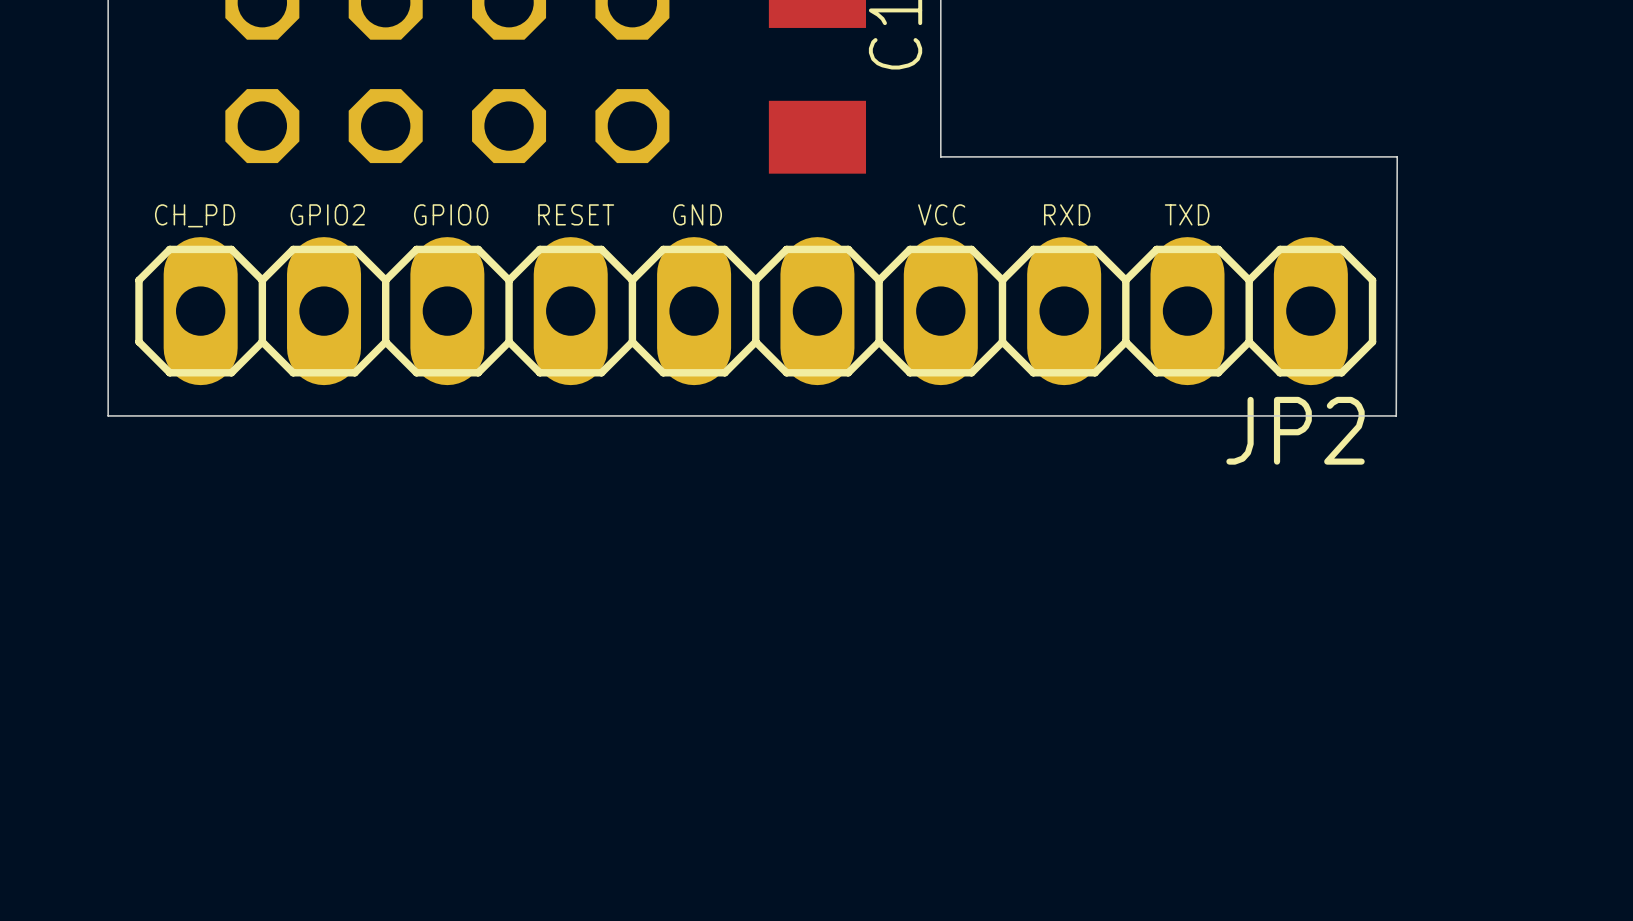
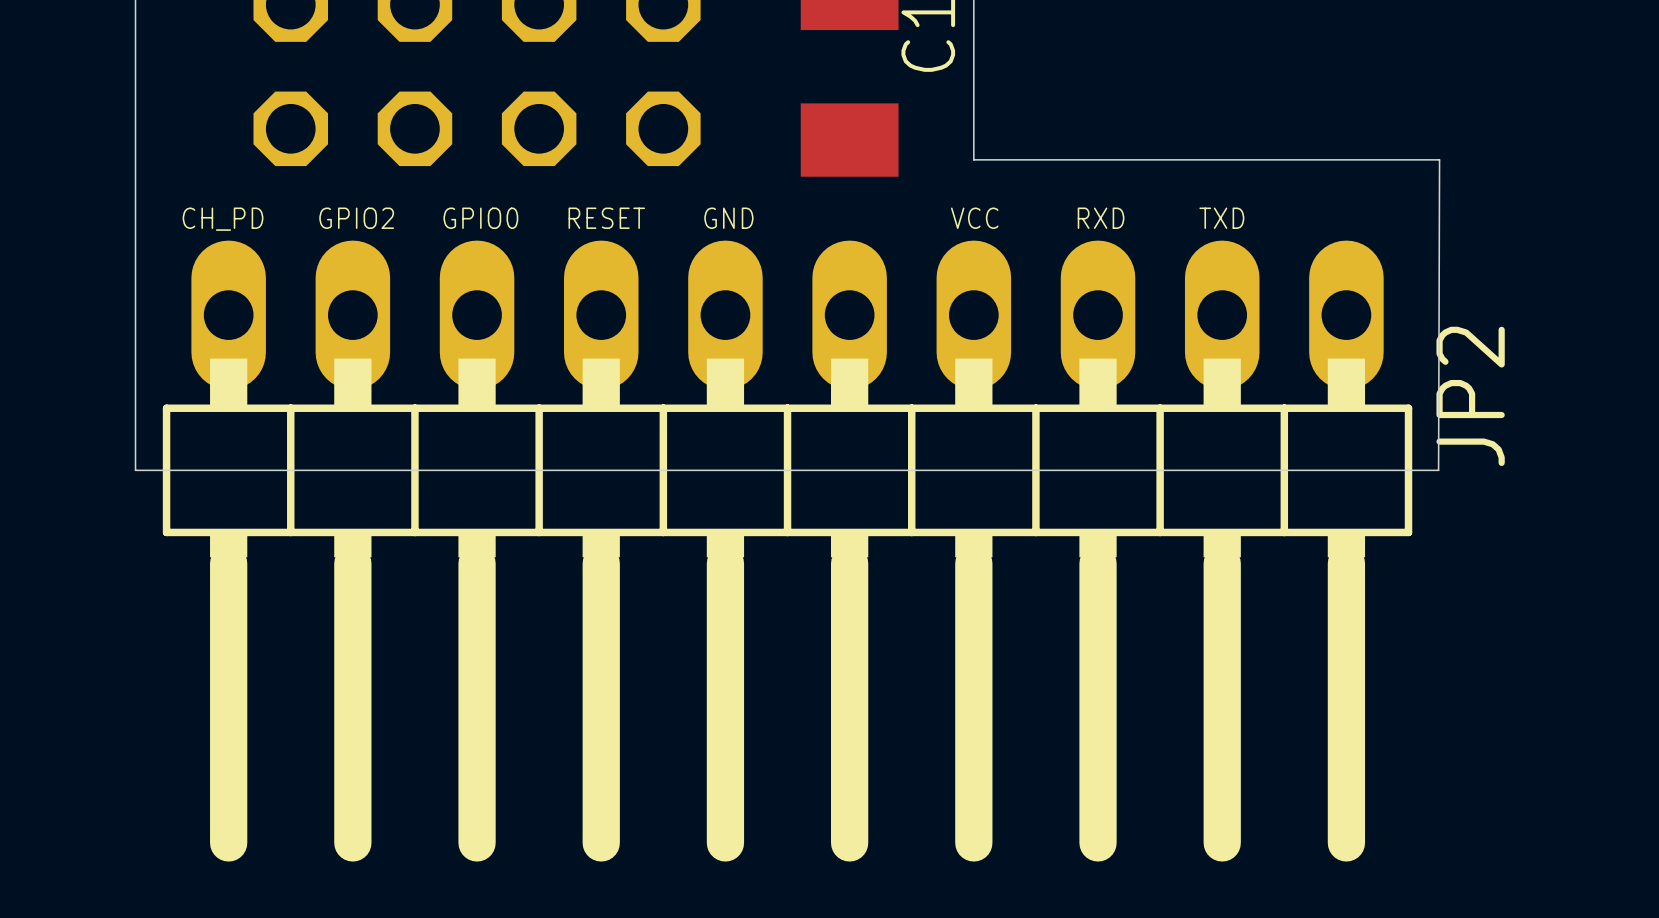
board edge: (1397, 156) (1396, 415) (108, 415) -> (1433, 159) (1439, 159) (1438, 470) (135, 470) (135, 420)
JP2 footprint: [135, 237, 1377, 386] -> [162, 240, 1413, 862]
JP2 name position: JP2 (1295, 430) -> JP2 (1470, 396)

